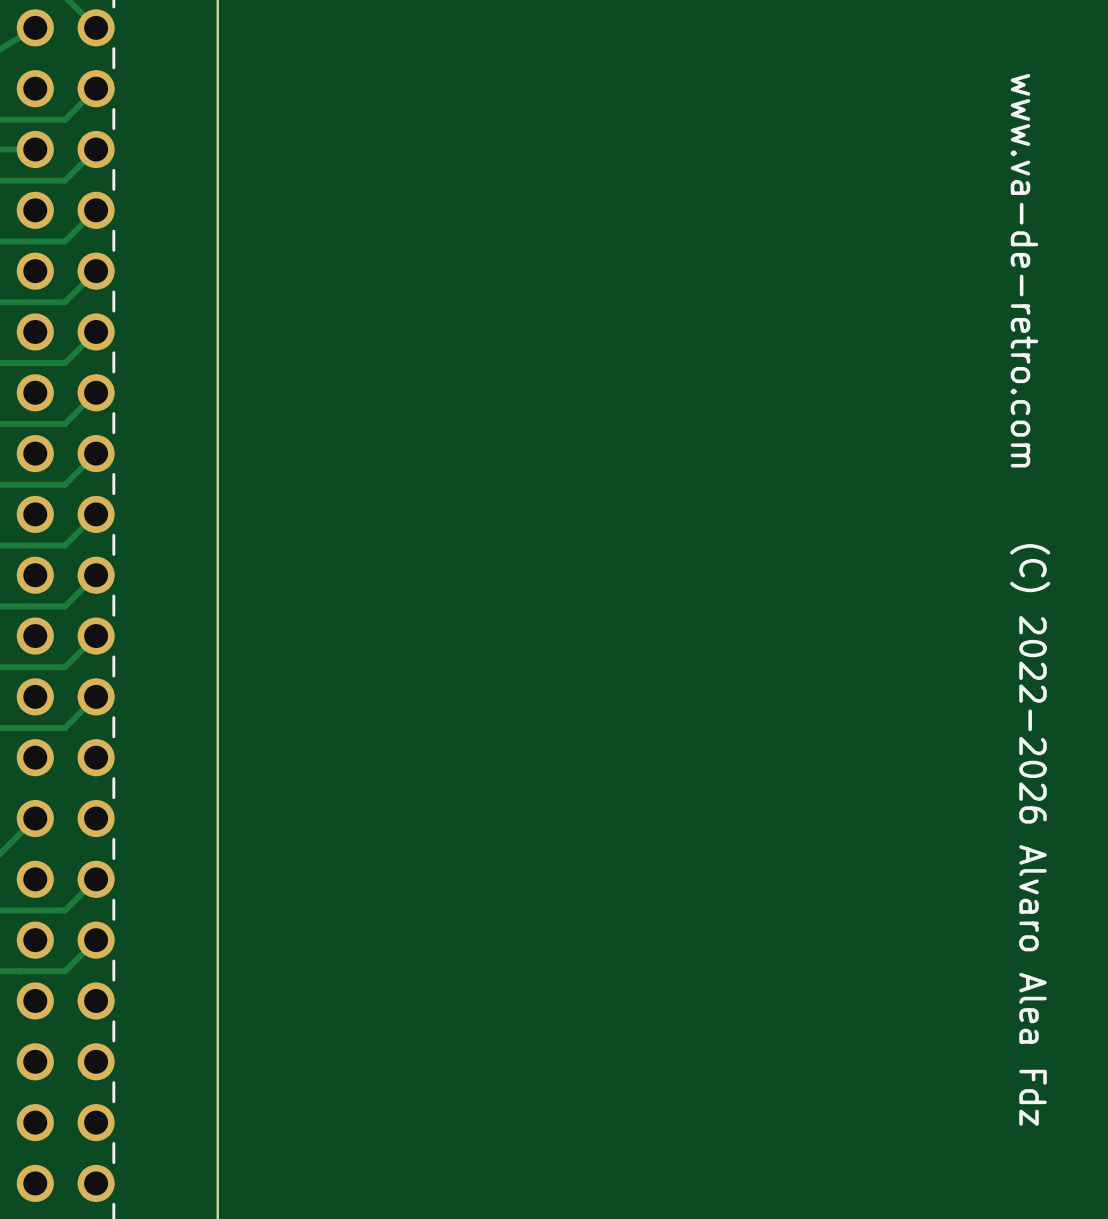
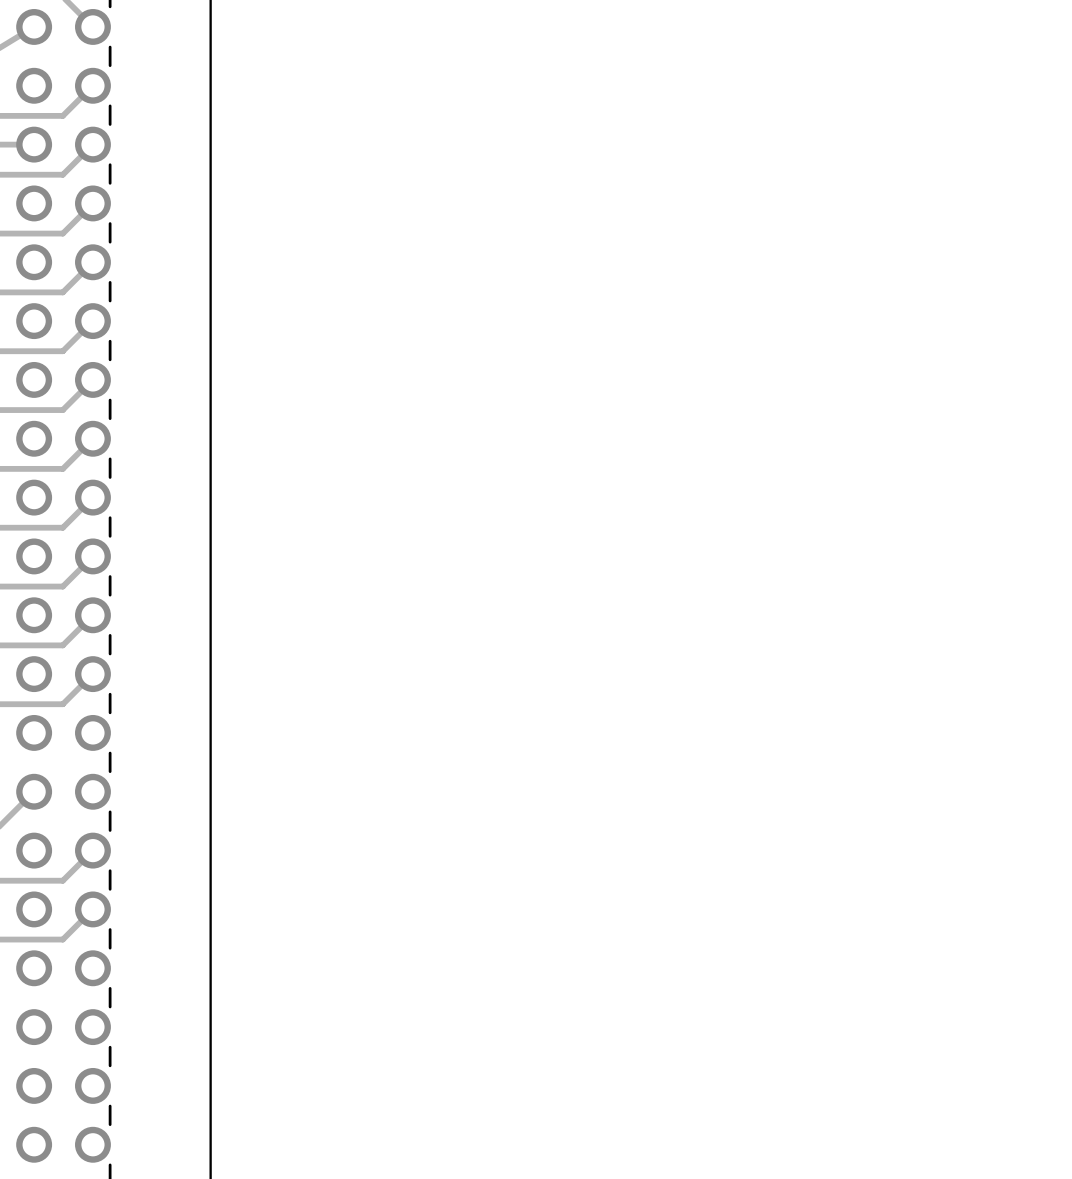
text: www.va-de-retro.com (1024, 270) -> none
text: (C) 2022-2026 Alvaro Alea Fdz (1030, 834) -> none

